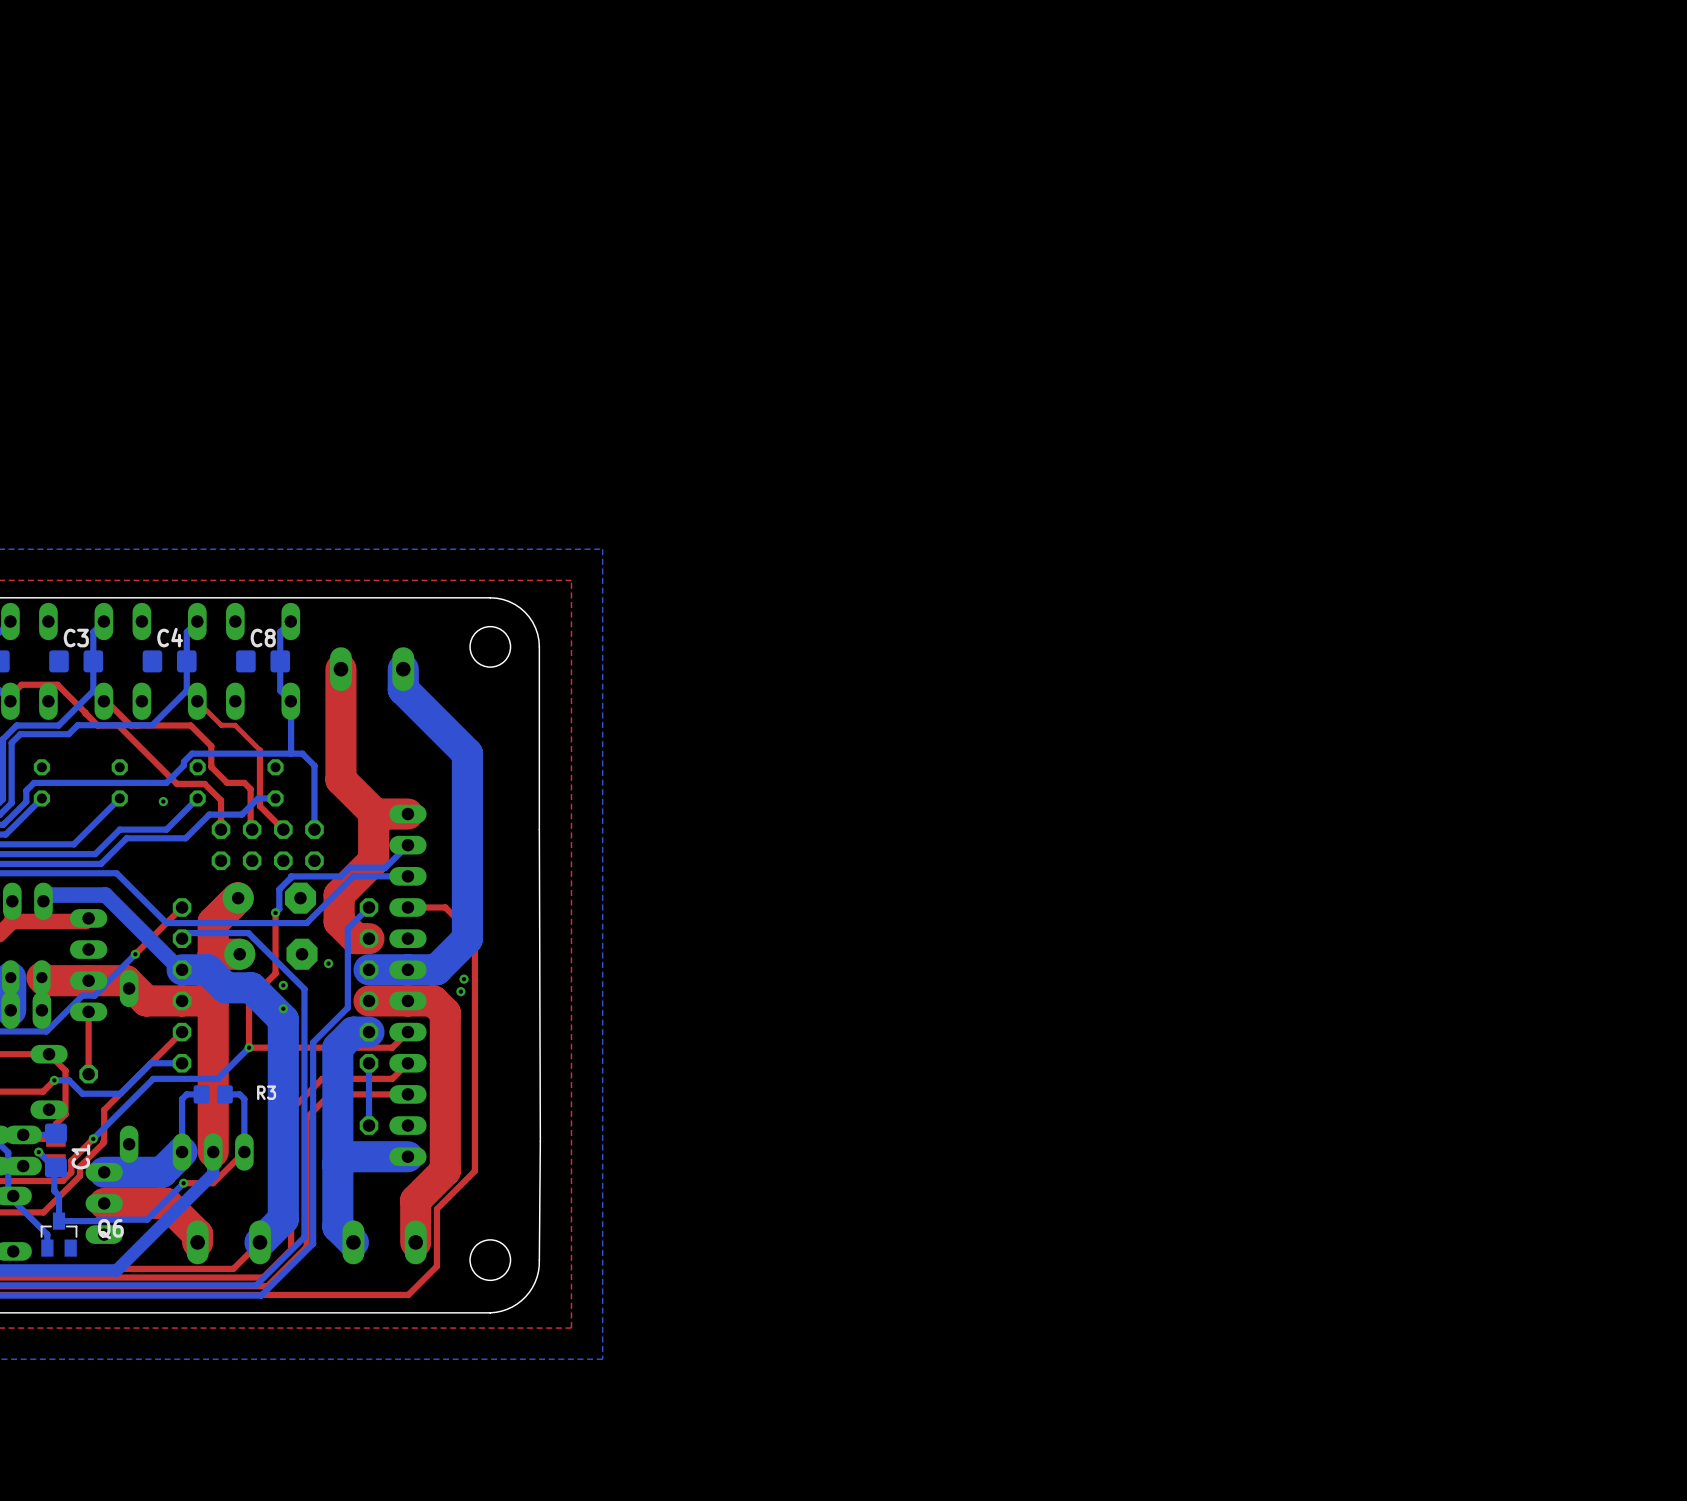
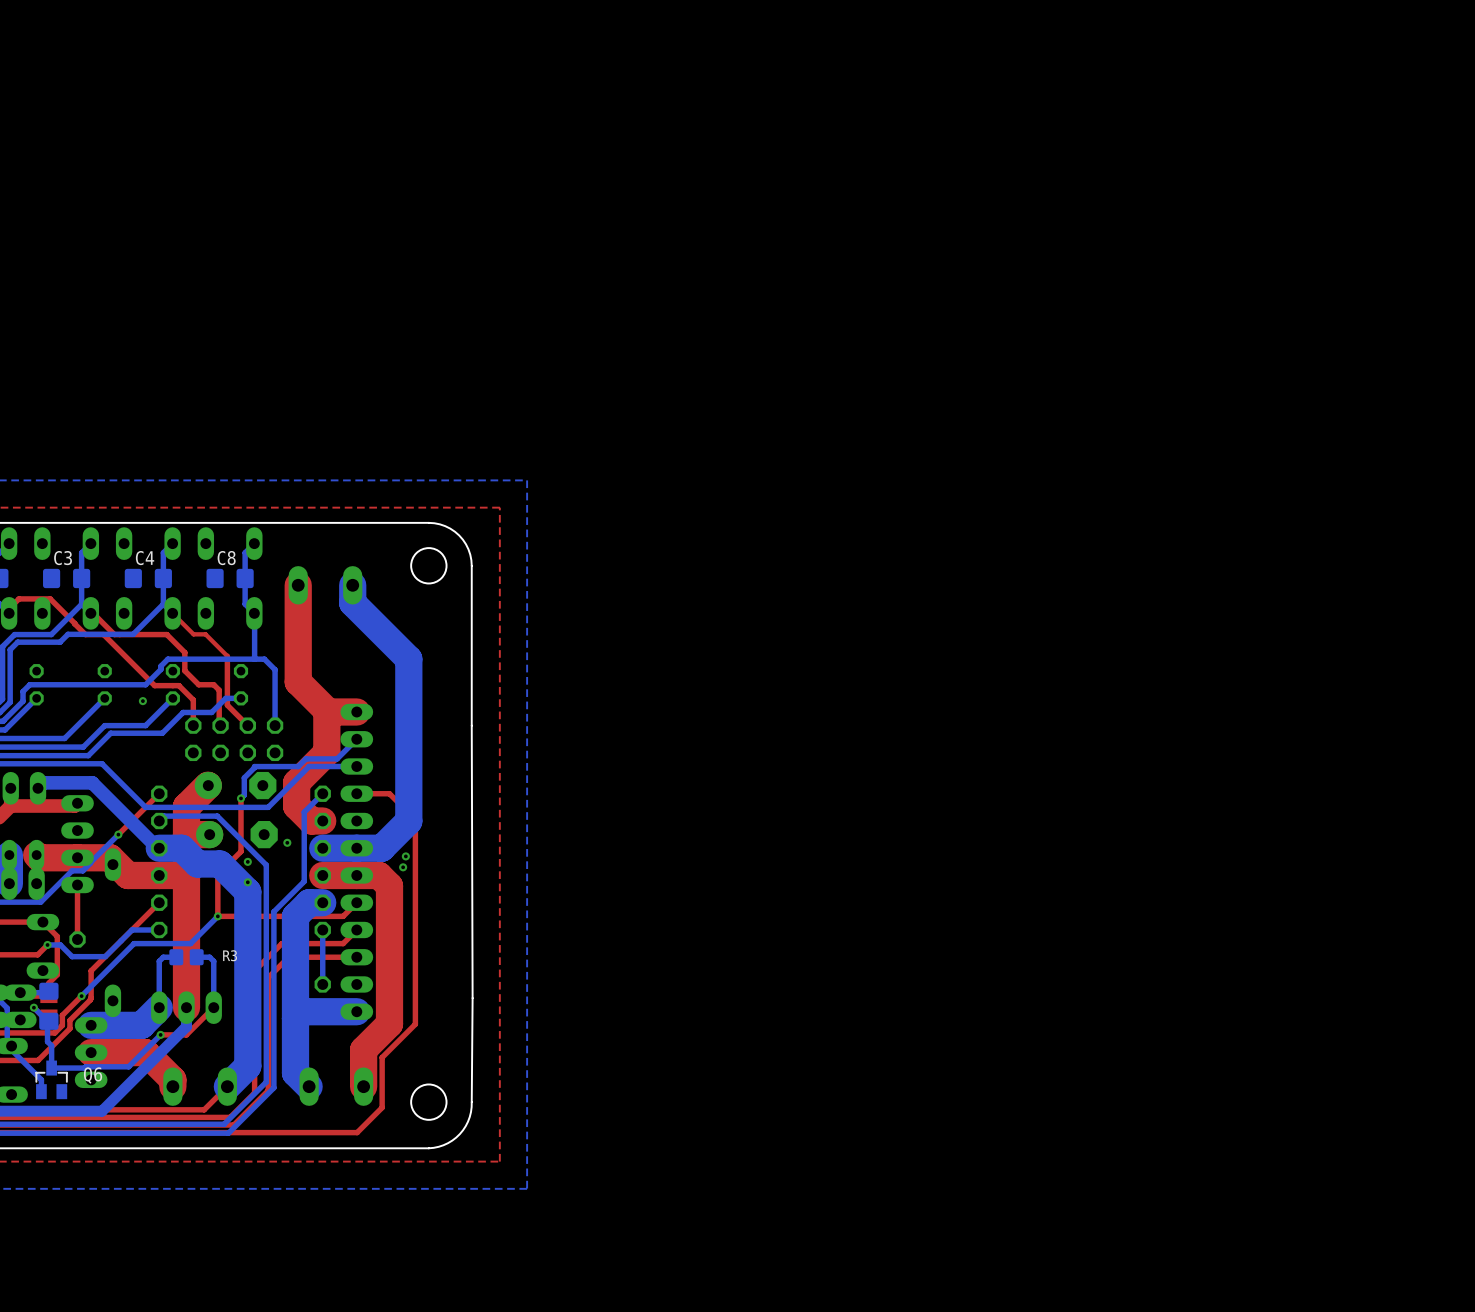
text: C1 (80, 1156) -> none

